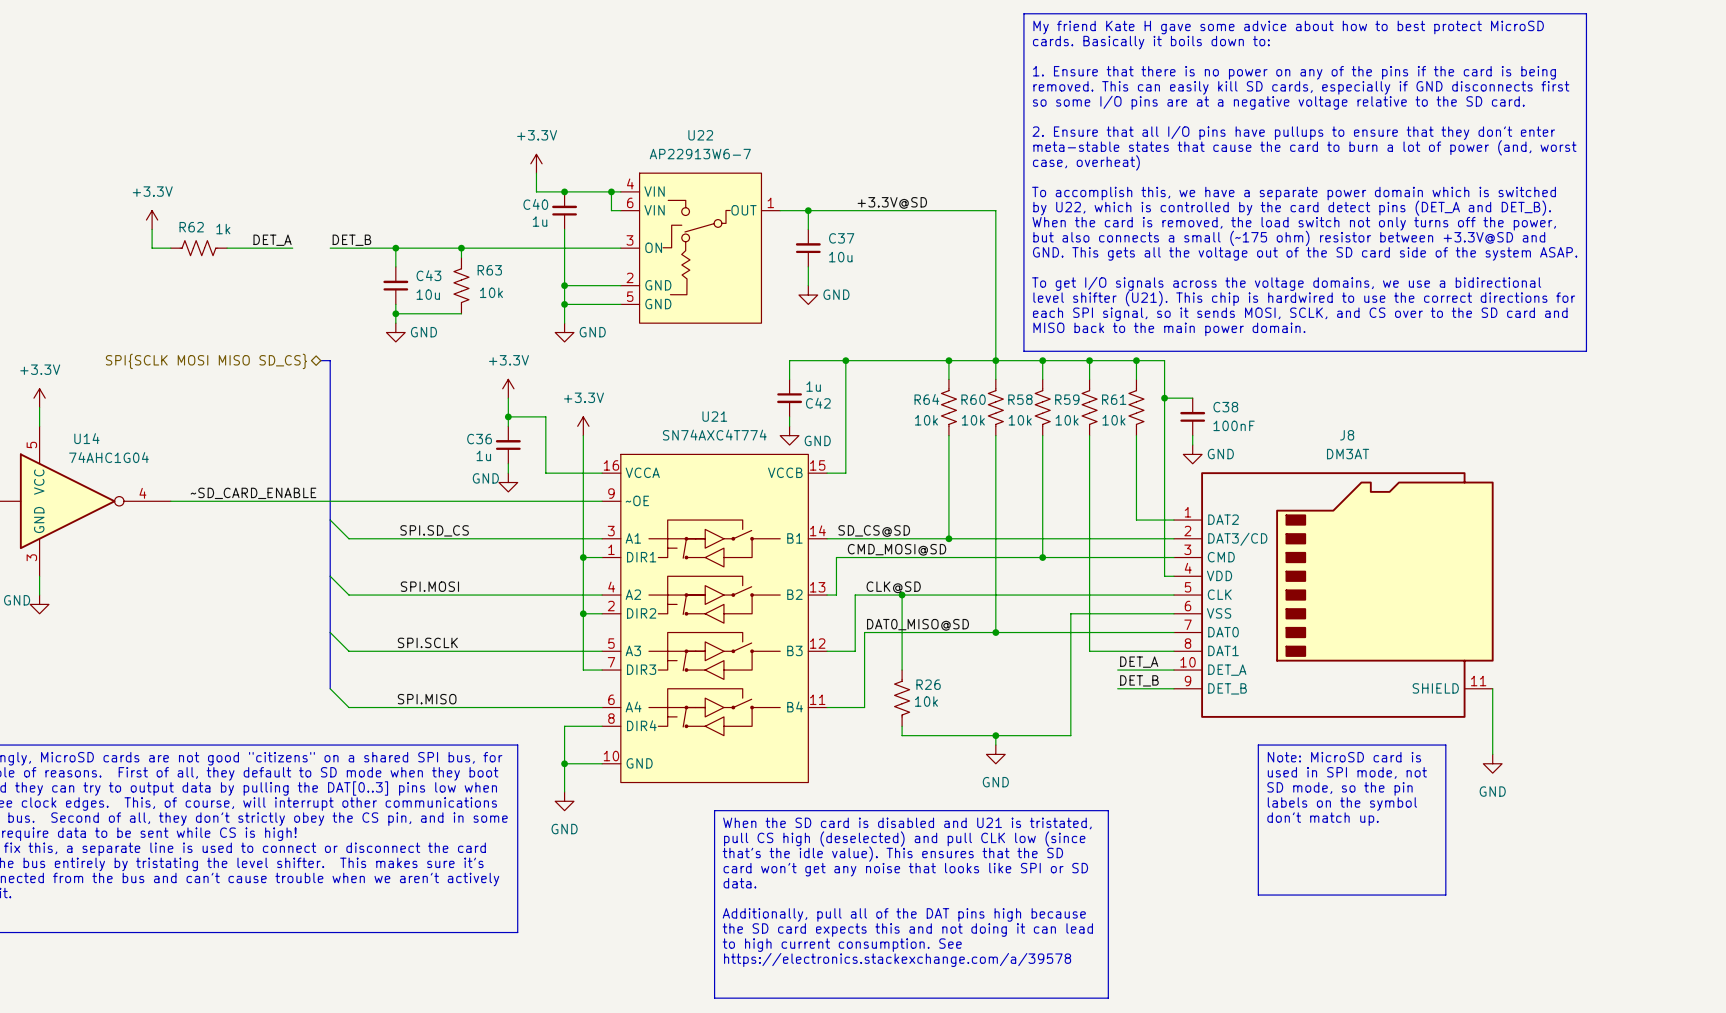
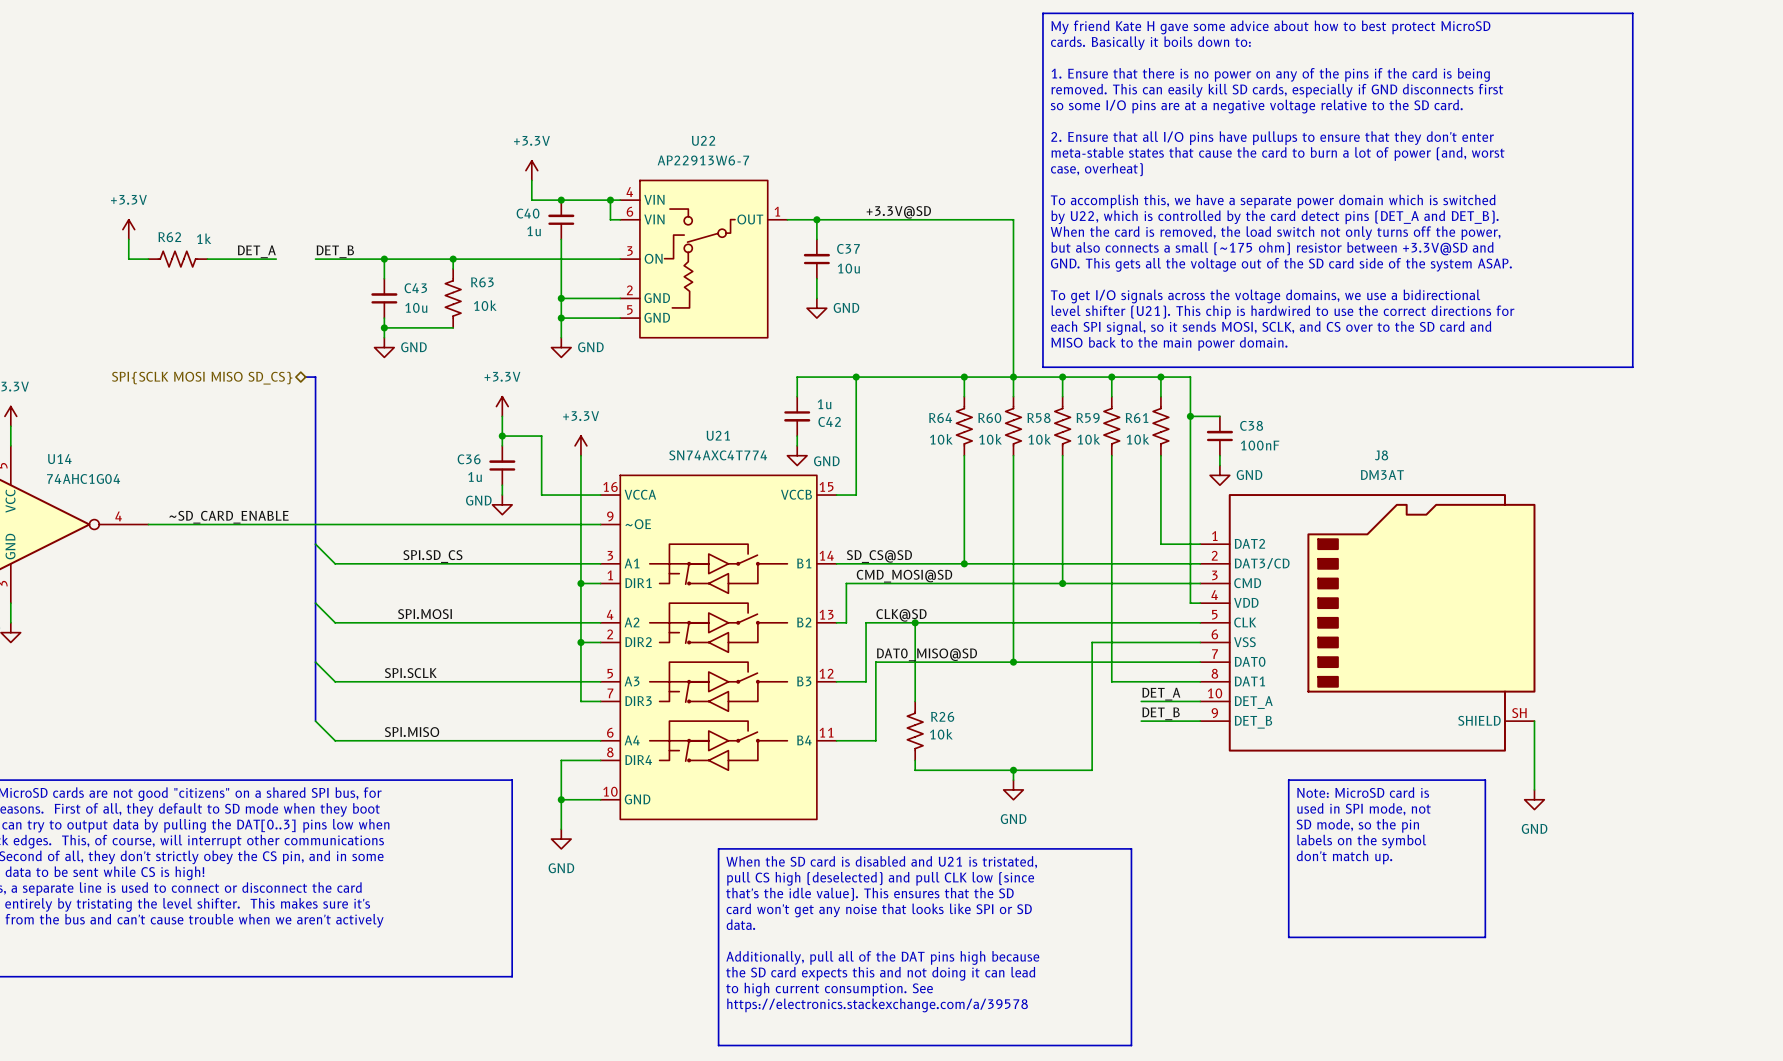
J8 pin number: 11 (1478, 681) -> SH (1519, 713)

